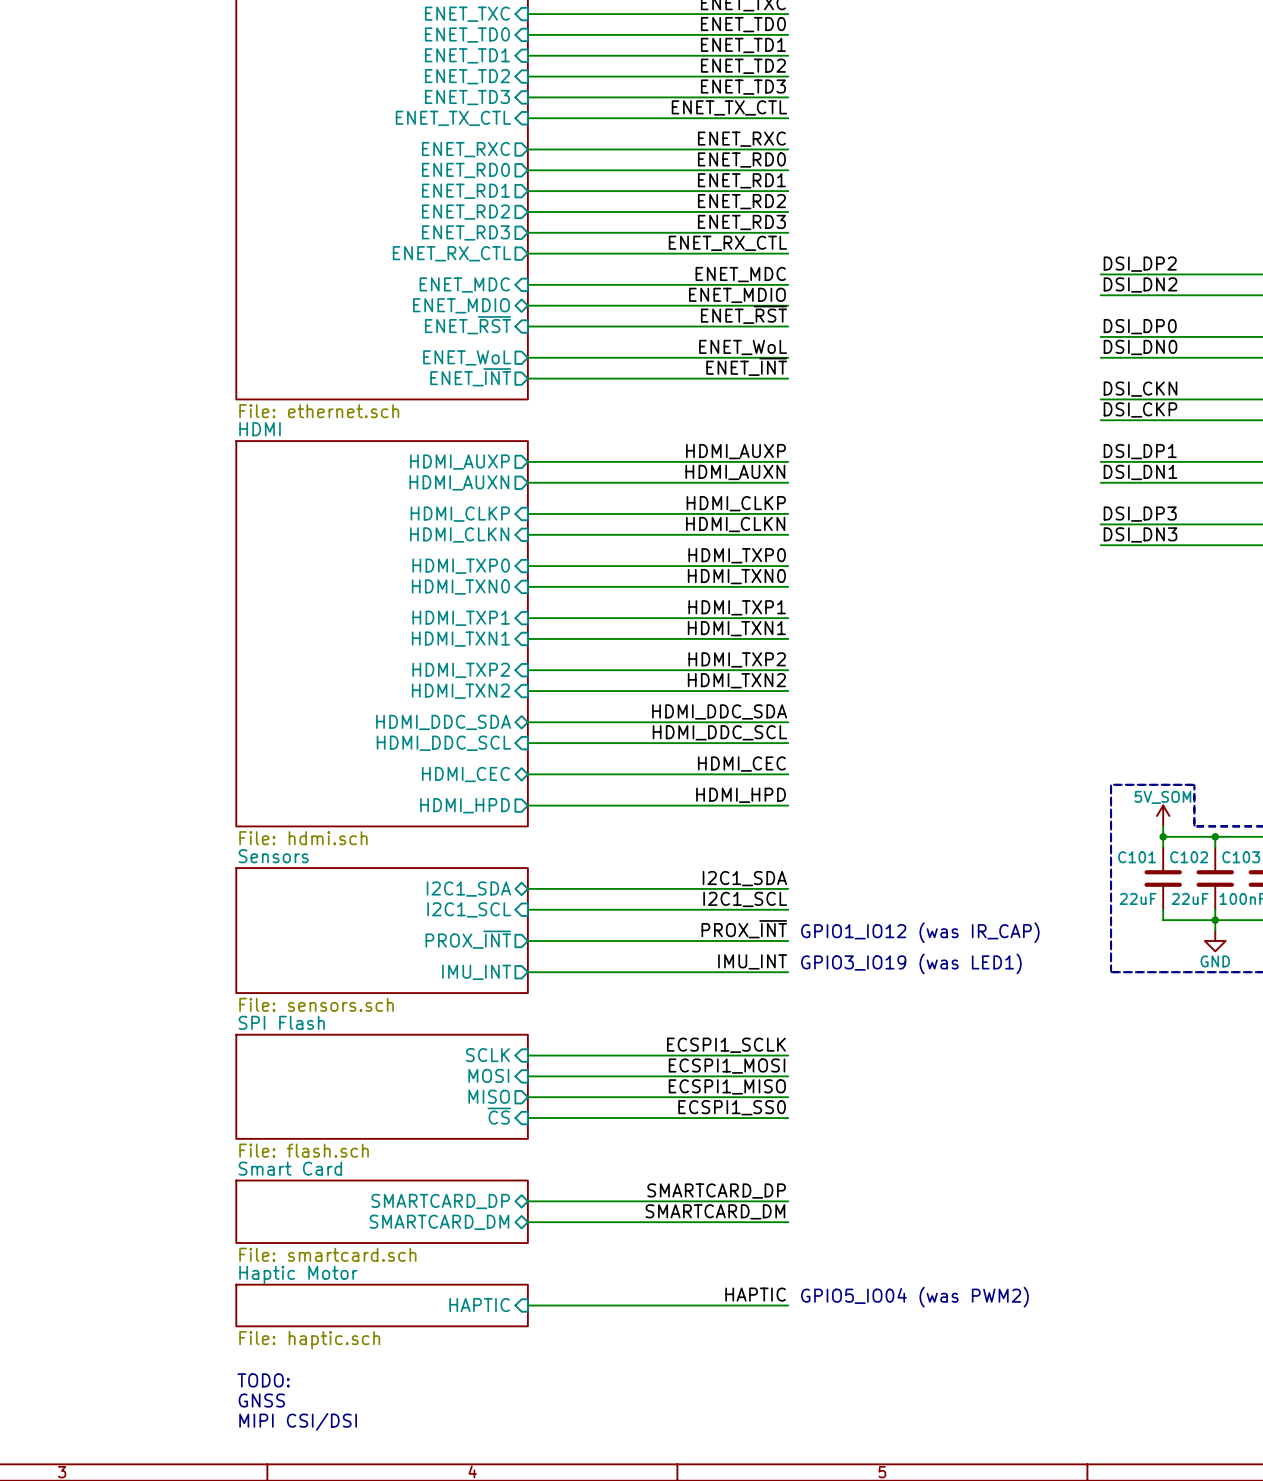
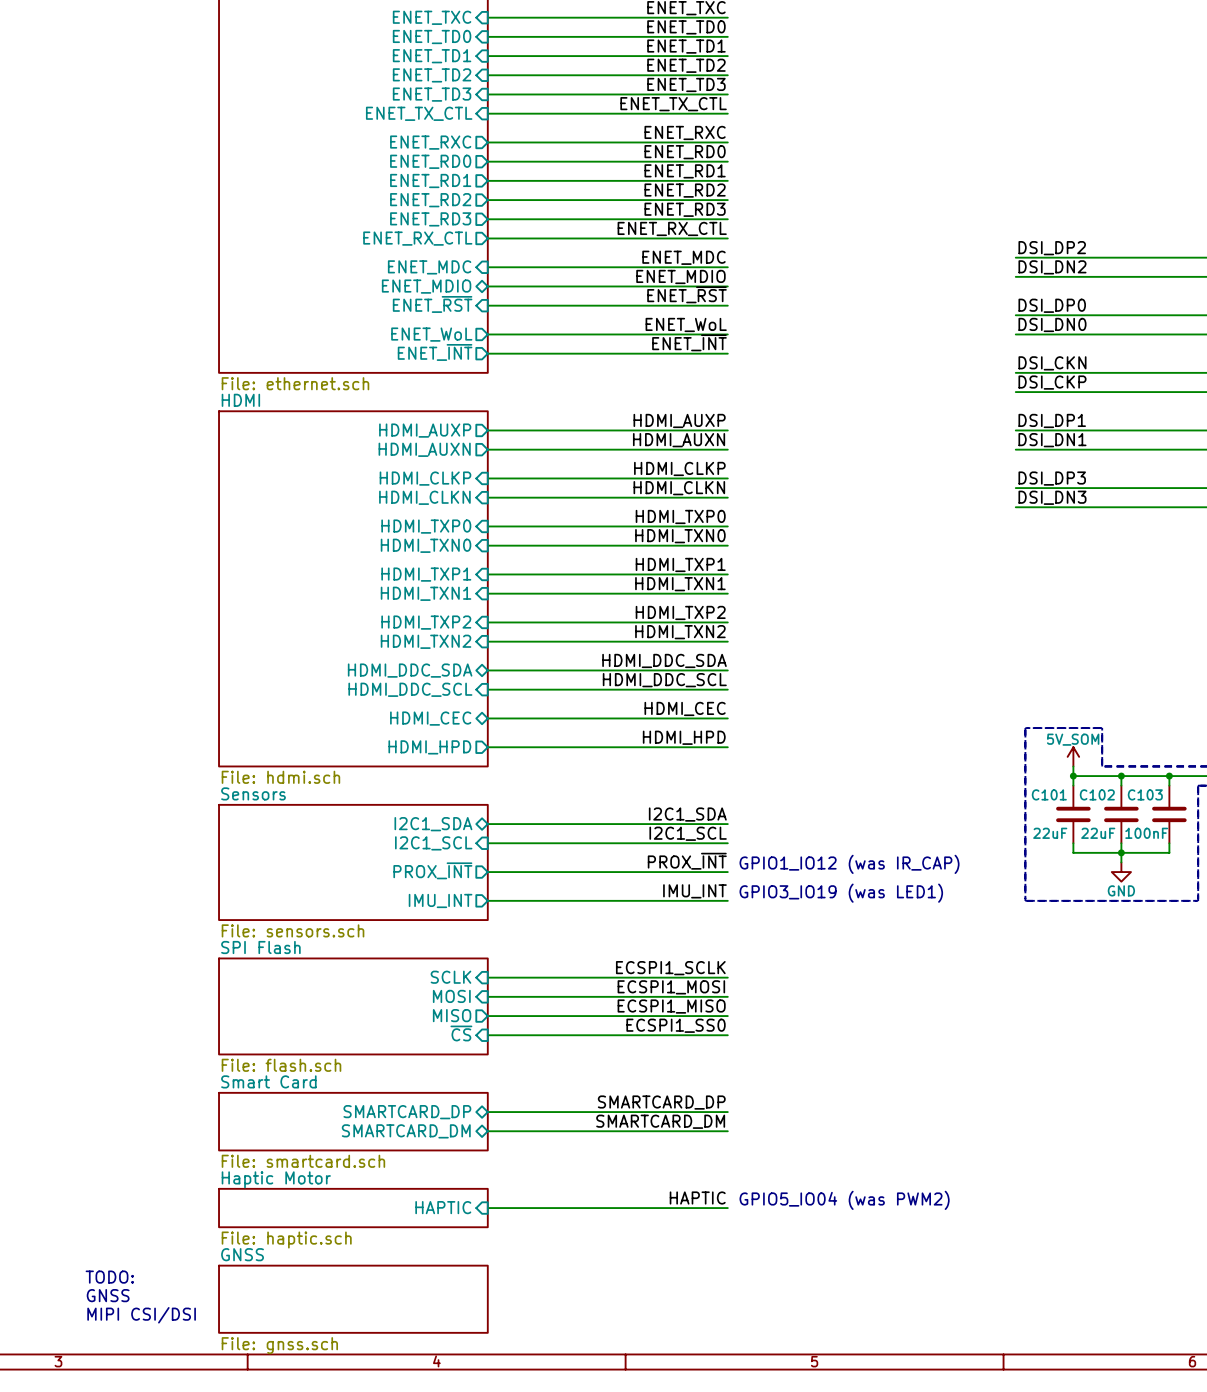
text position: TODO: (263, 1380) -> TODO: (109, 1277)
text position: GNSS (261, 1400) -> GNSS (108, 1295)
sheet GNSS: none -> File: gnss.sch (353, 1299)
text position: MIPI CSI/DSI (298, 1421) -> MIPI CSI/DSI (141, 1315)

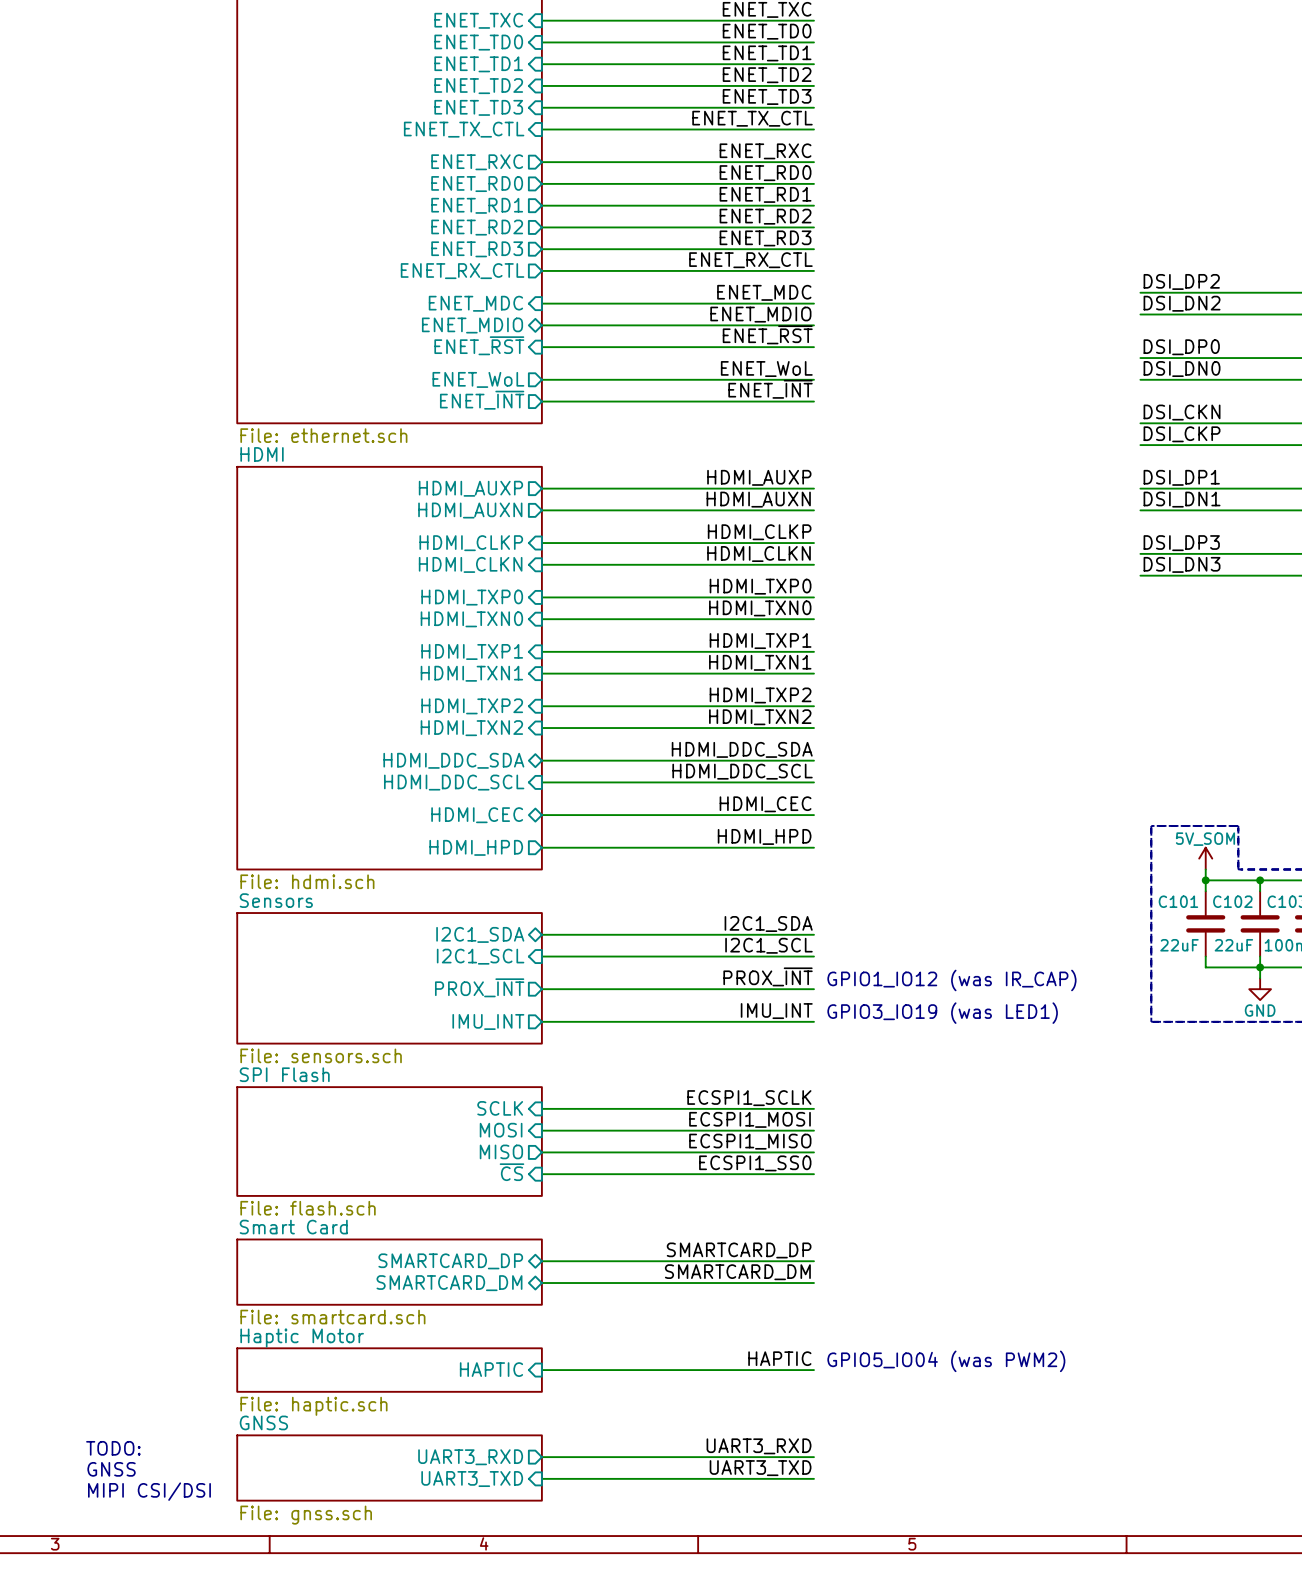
sheet GNSS shape: [219, 1265, 488, 1333] -> [237, 1435, 542, 1501]
label: none -> UART3_RXD (759, 1446)
sheet pin: none -> UART3_RXD (470, 1457)
wire: none -> (541, 1457) (813, 1457)
label: none -> UART3_TXD (760, 1468)
sheet pin: none -> UART3_TXD (472, 1479)
wire: none -> (541, 1478) (813, 1478)

